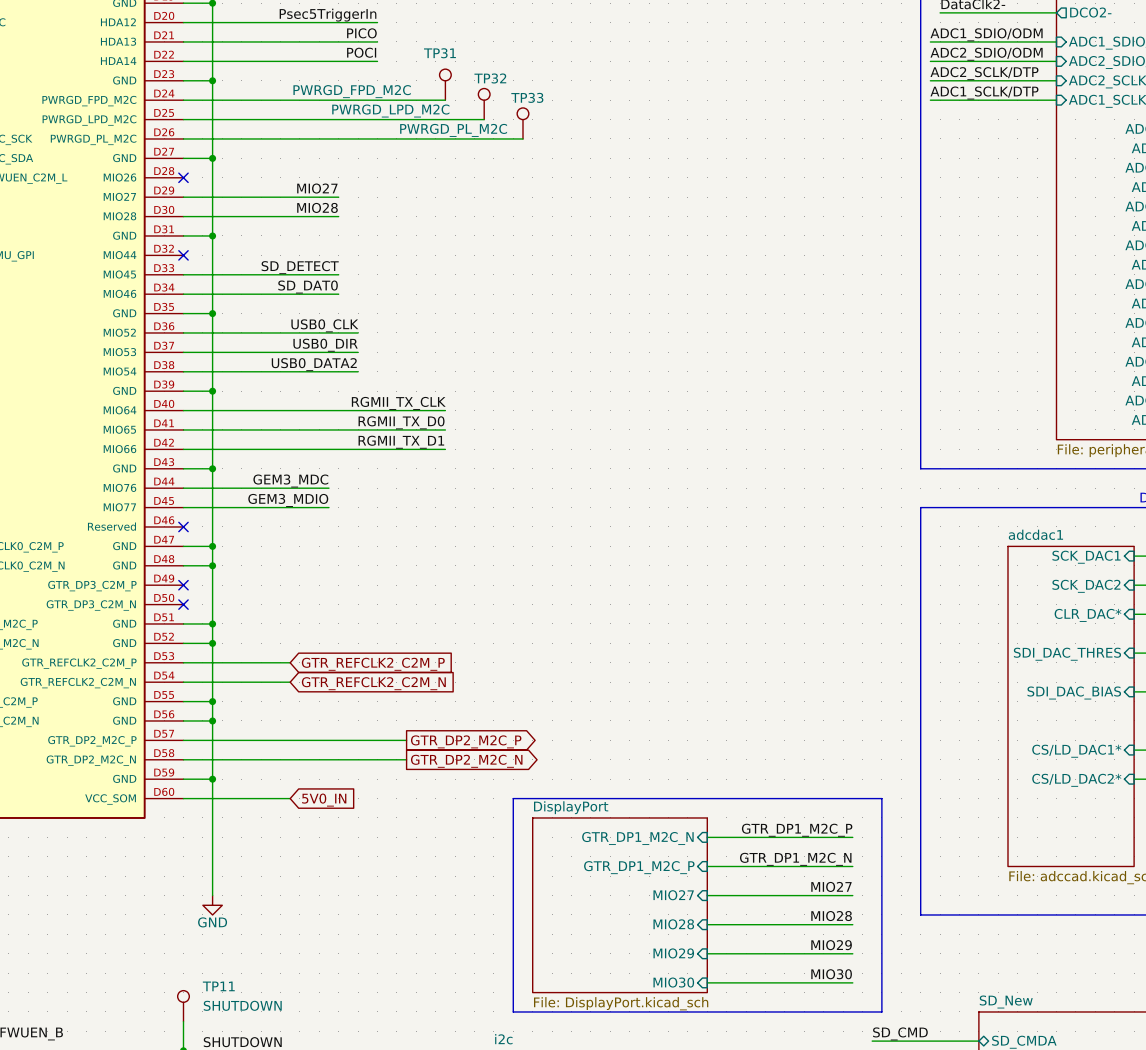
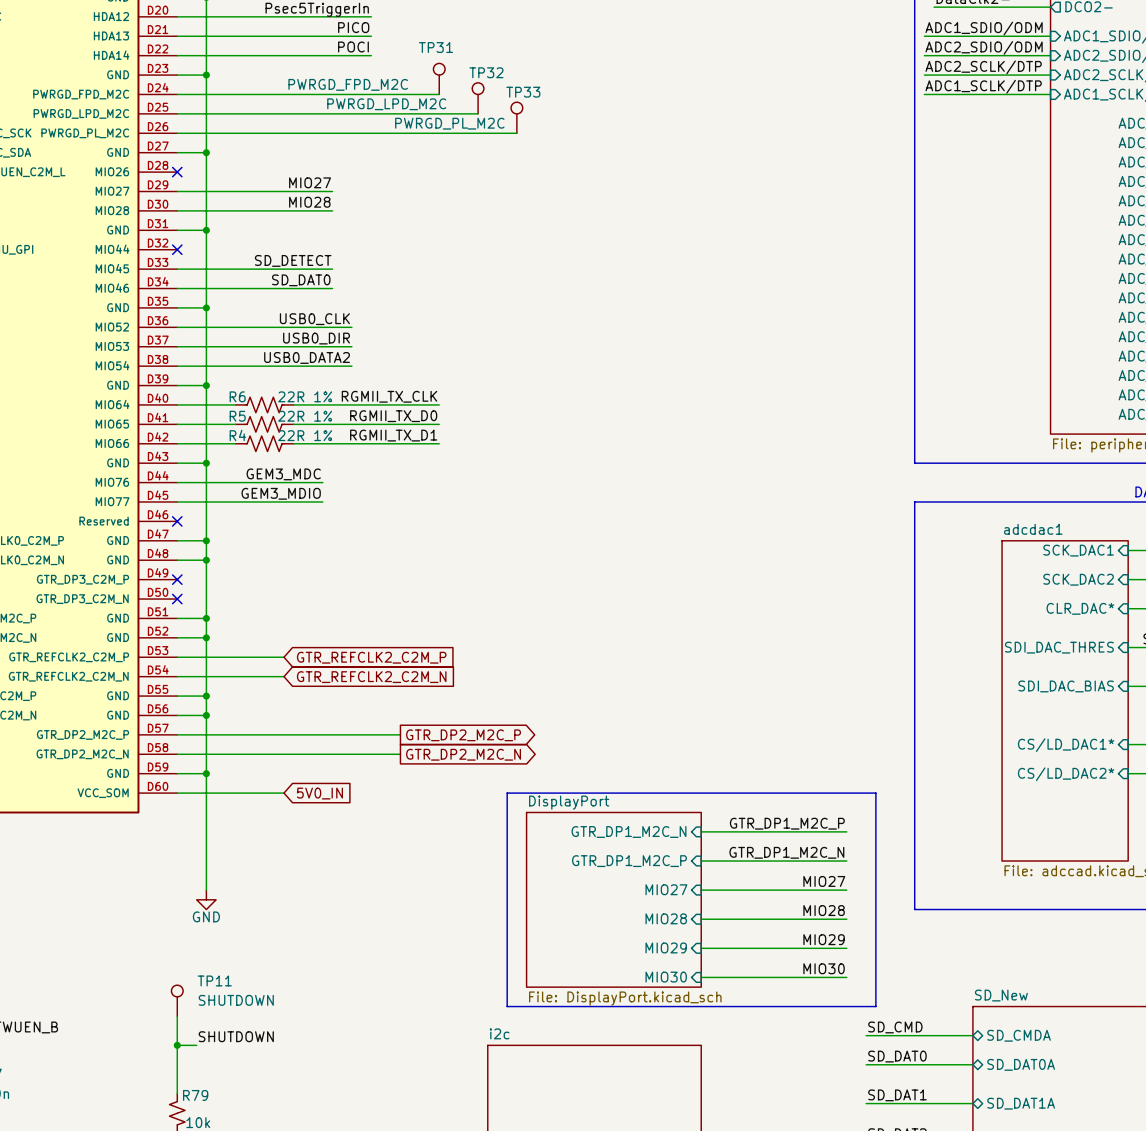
R6: none -> 22R 1% (264, 404)
R5: none -> 22R 1% (264, 424)
R4: none -> 22R 1% (264, 443)

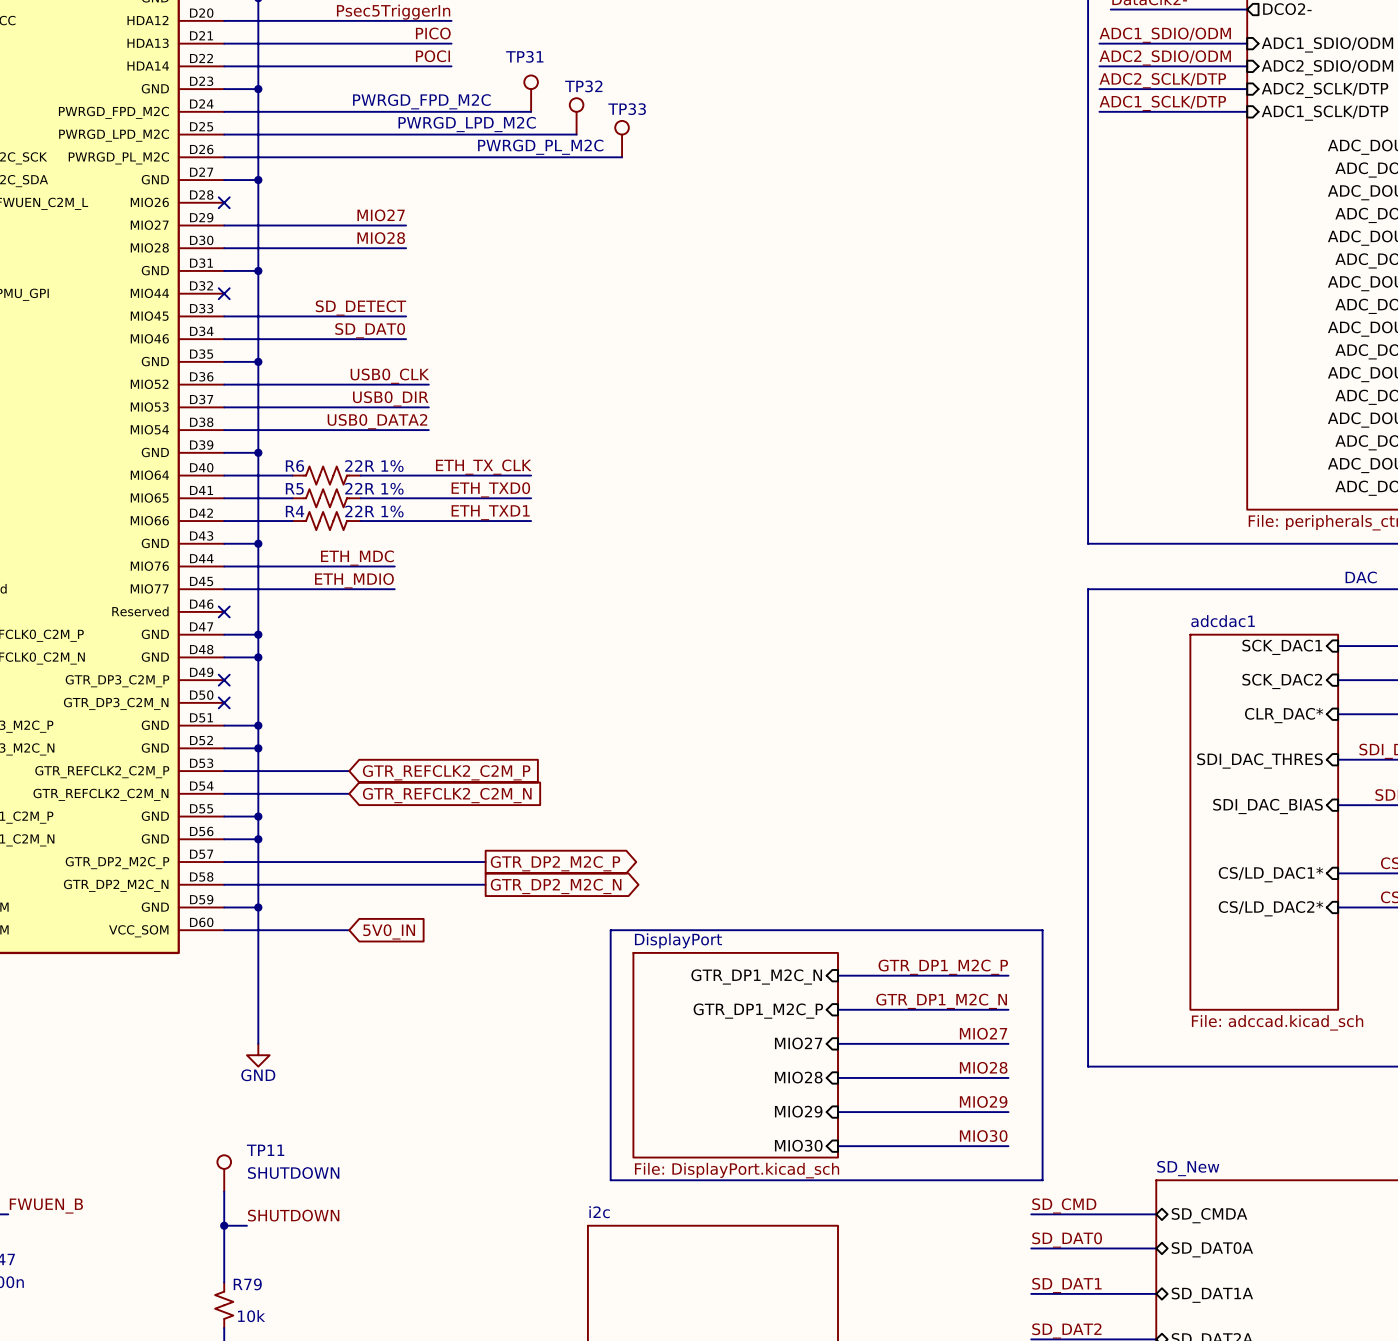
label: RGMII_TX_CLK (389, 396) -> ETH_TX_CLK (483, 467)
label: RGMII_TX_D0 (393, 416) -> ETH_TXD0 (490, 489)
label: RGMII_TX_D1 (393, 435) -> ETH_TXD1 (490, 512)
label: GEM3_MDC (283, 474) -> ETH_MDC (357, 558)
label: GEM3_MDIO (281, 493) -> ETH_MDIO (354, 580)

